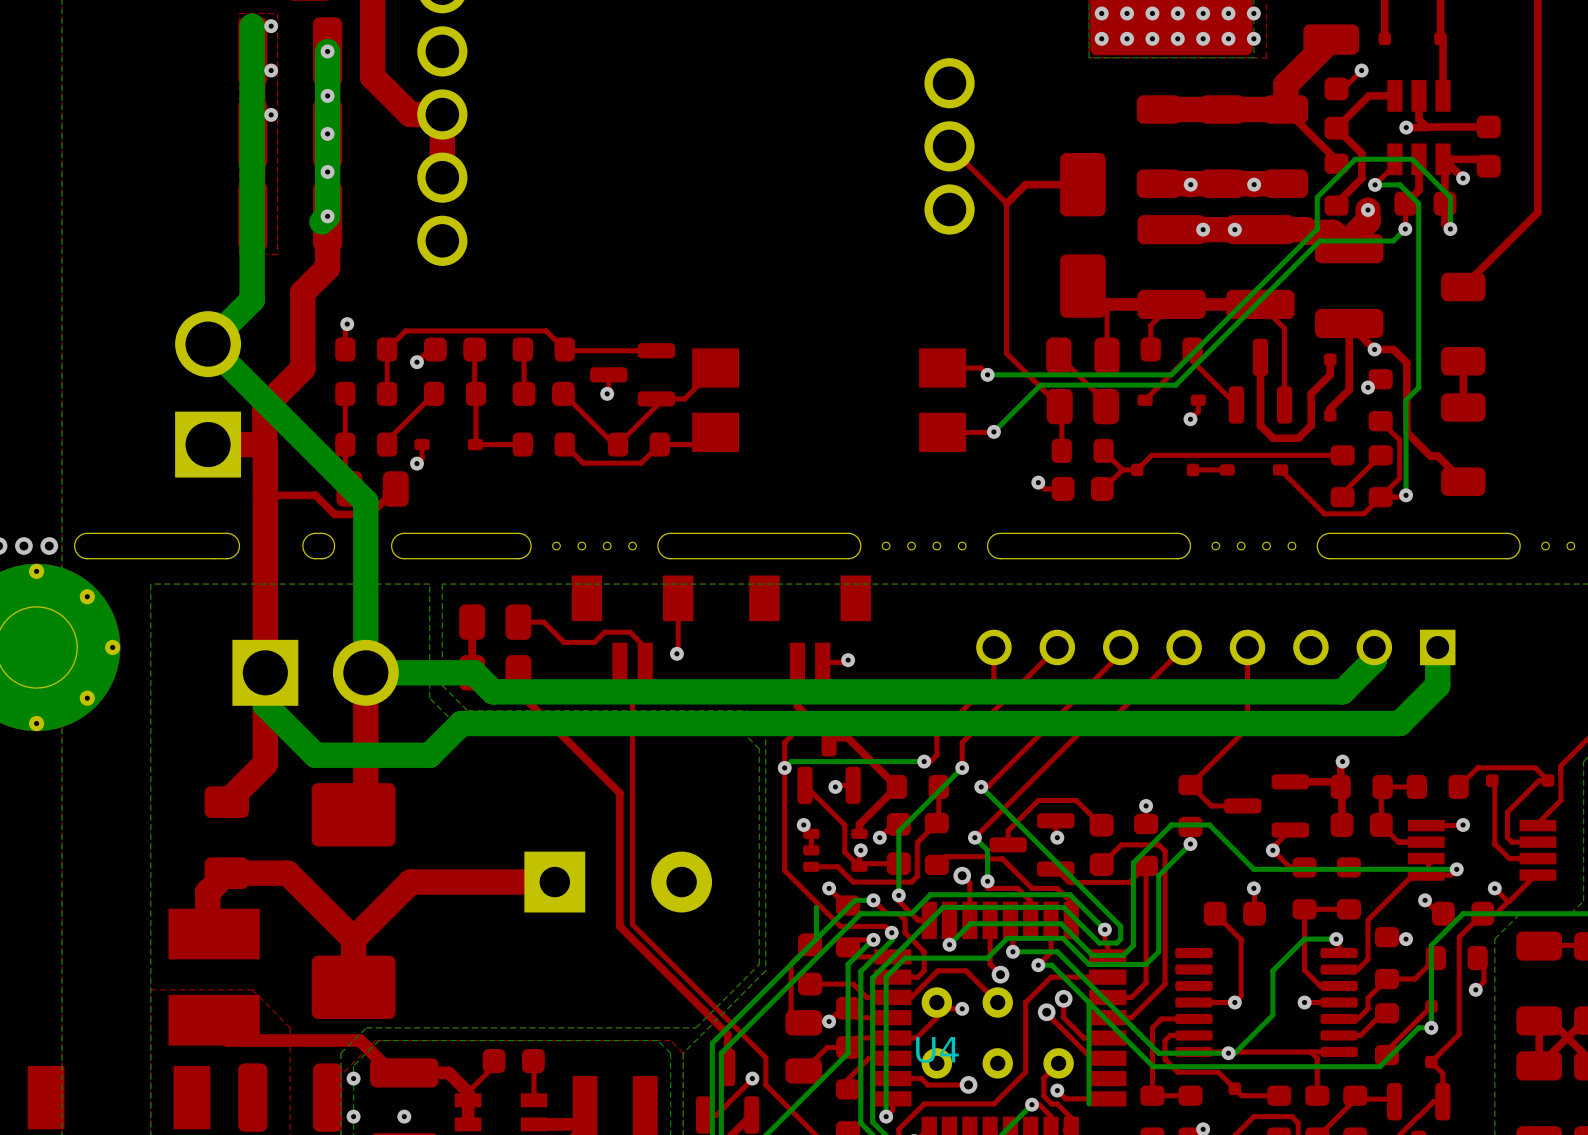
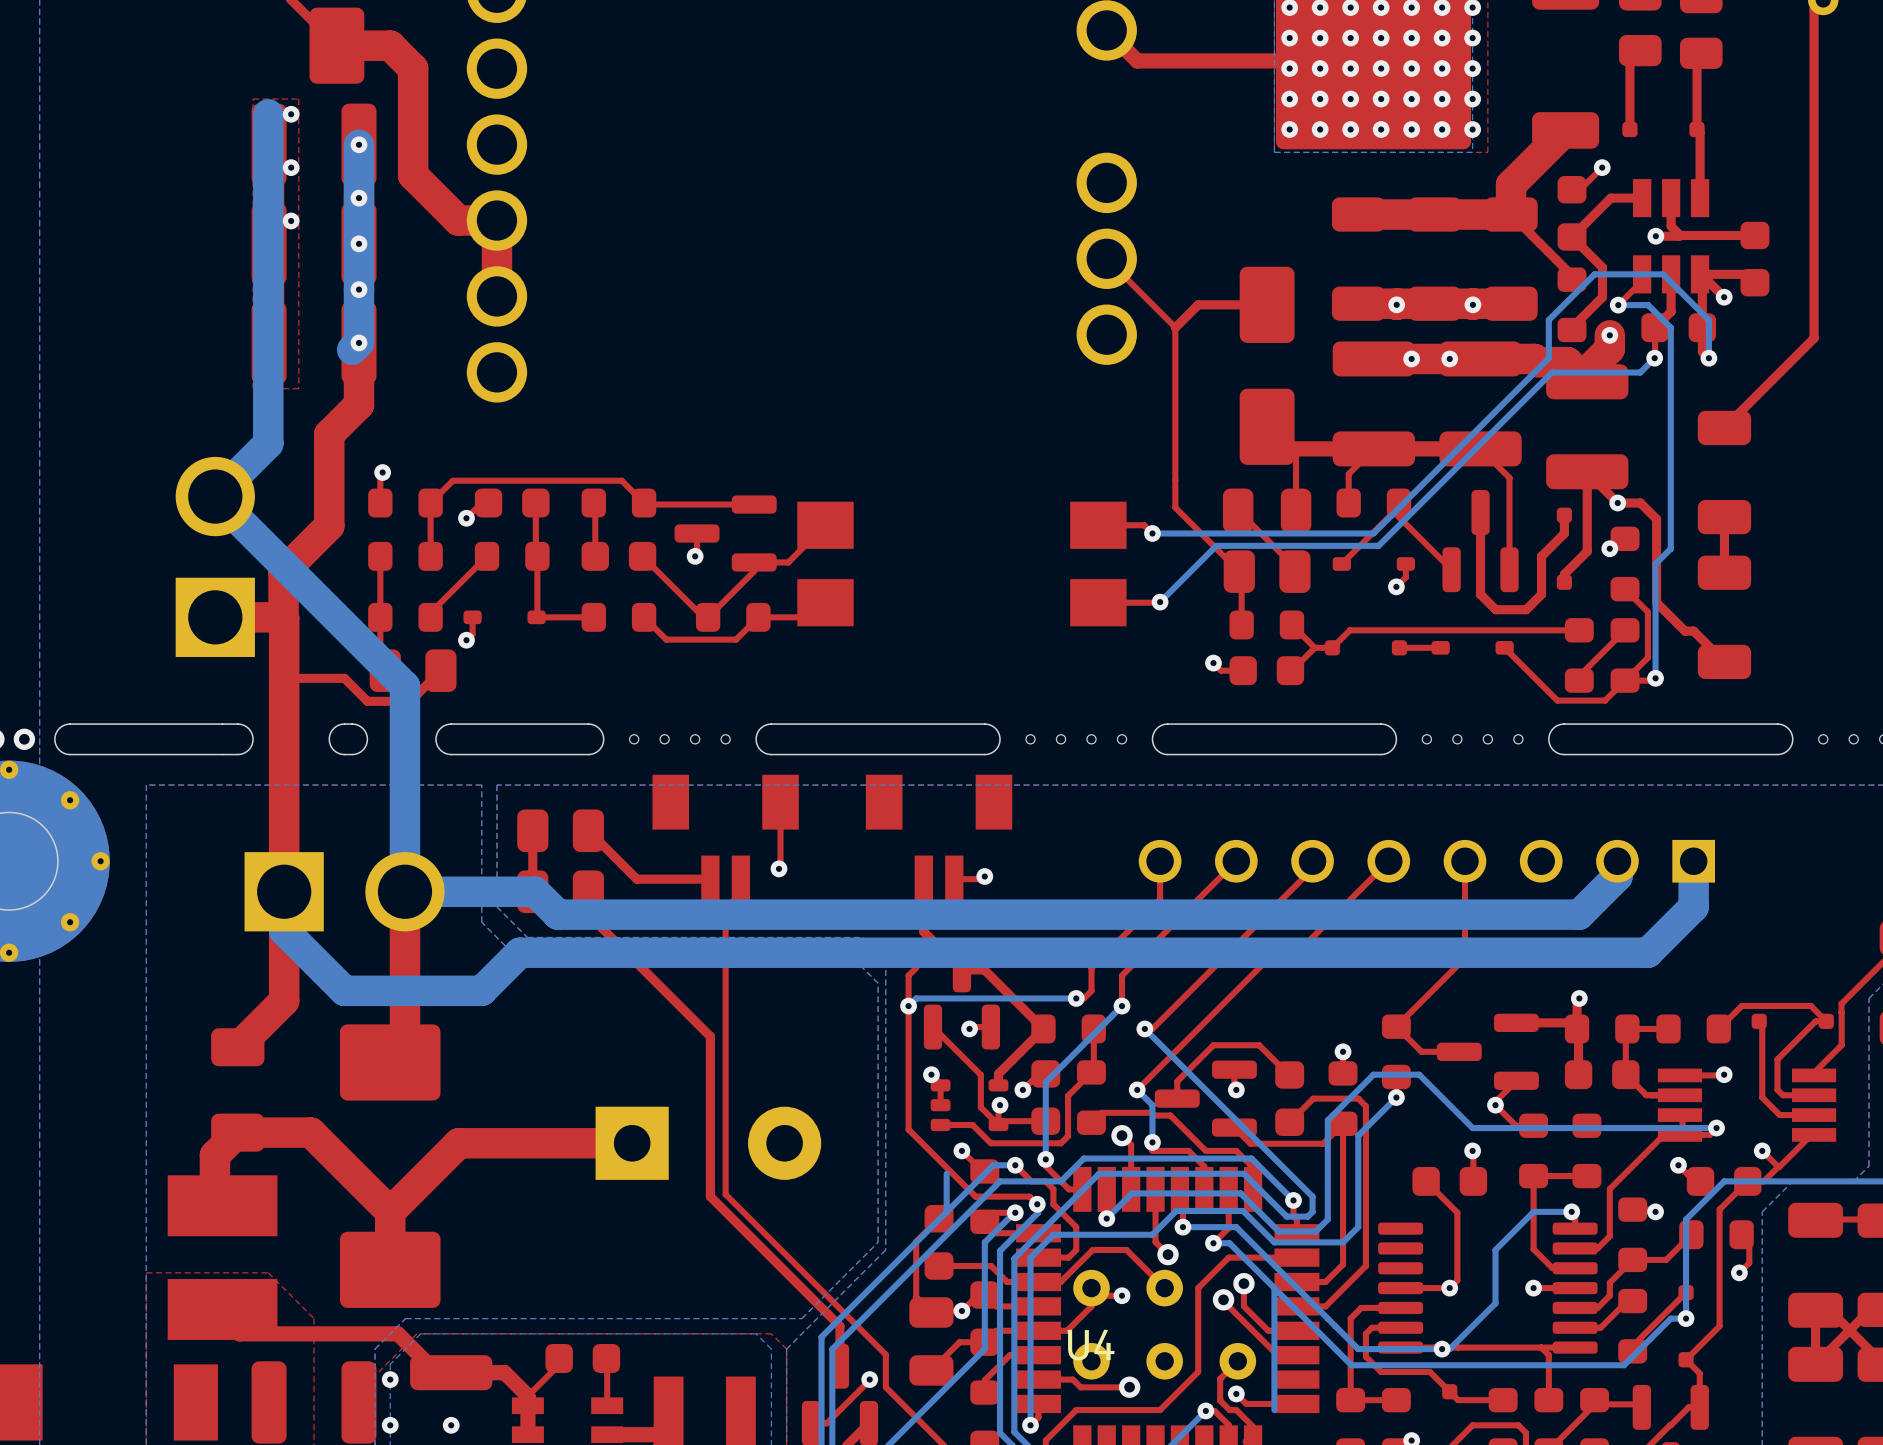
top track: (518, 622) (543, 622) (564, 642) (594, 642) (604, 632) (630, 632) (645, 647) (645, 662) -> (588, 830) (636, 879) (710, 879)

